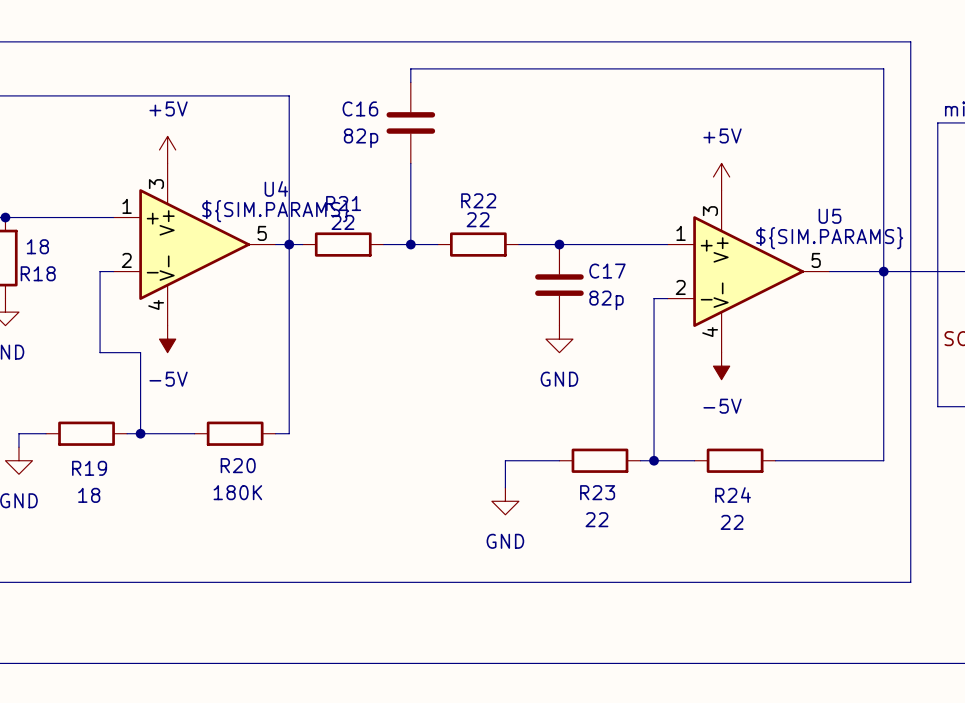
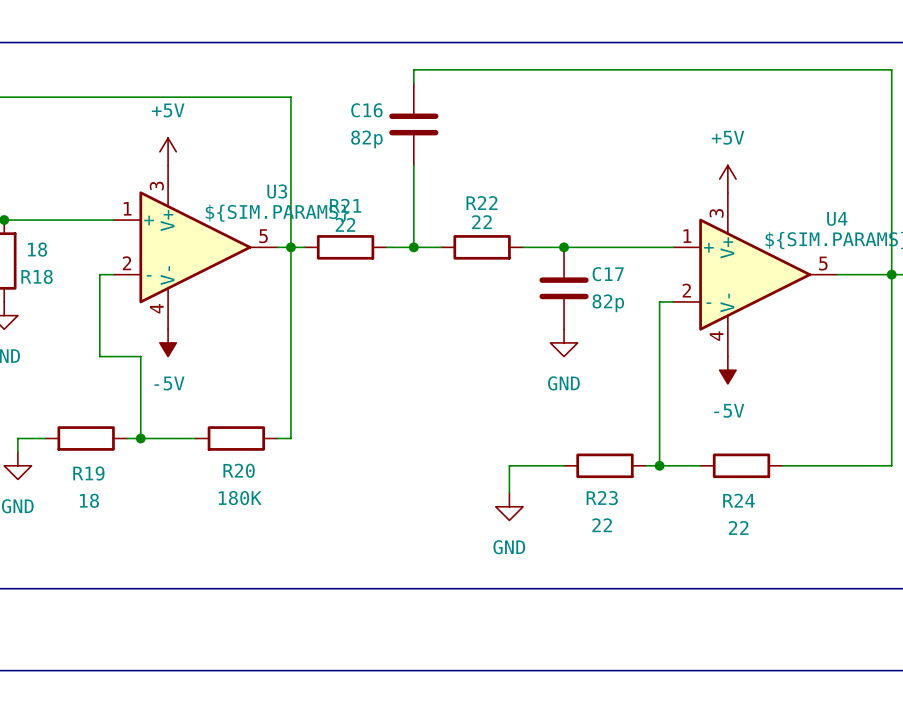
U4 name: U4 (276, 188) -> U3 (277, 191)
U5 name: U5 (830, 216) -> U4 (837, 218)

